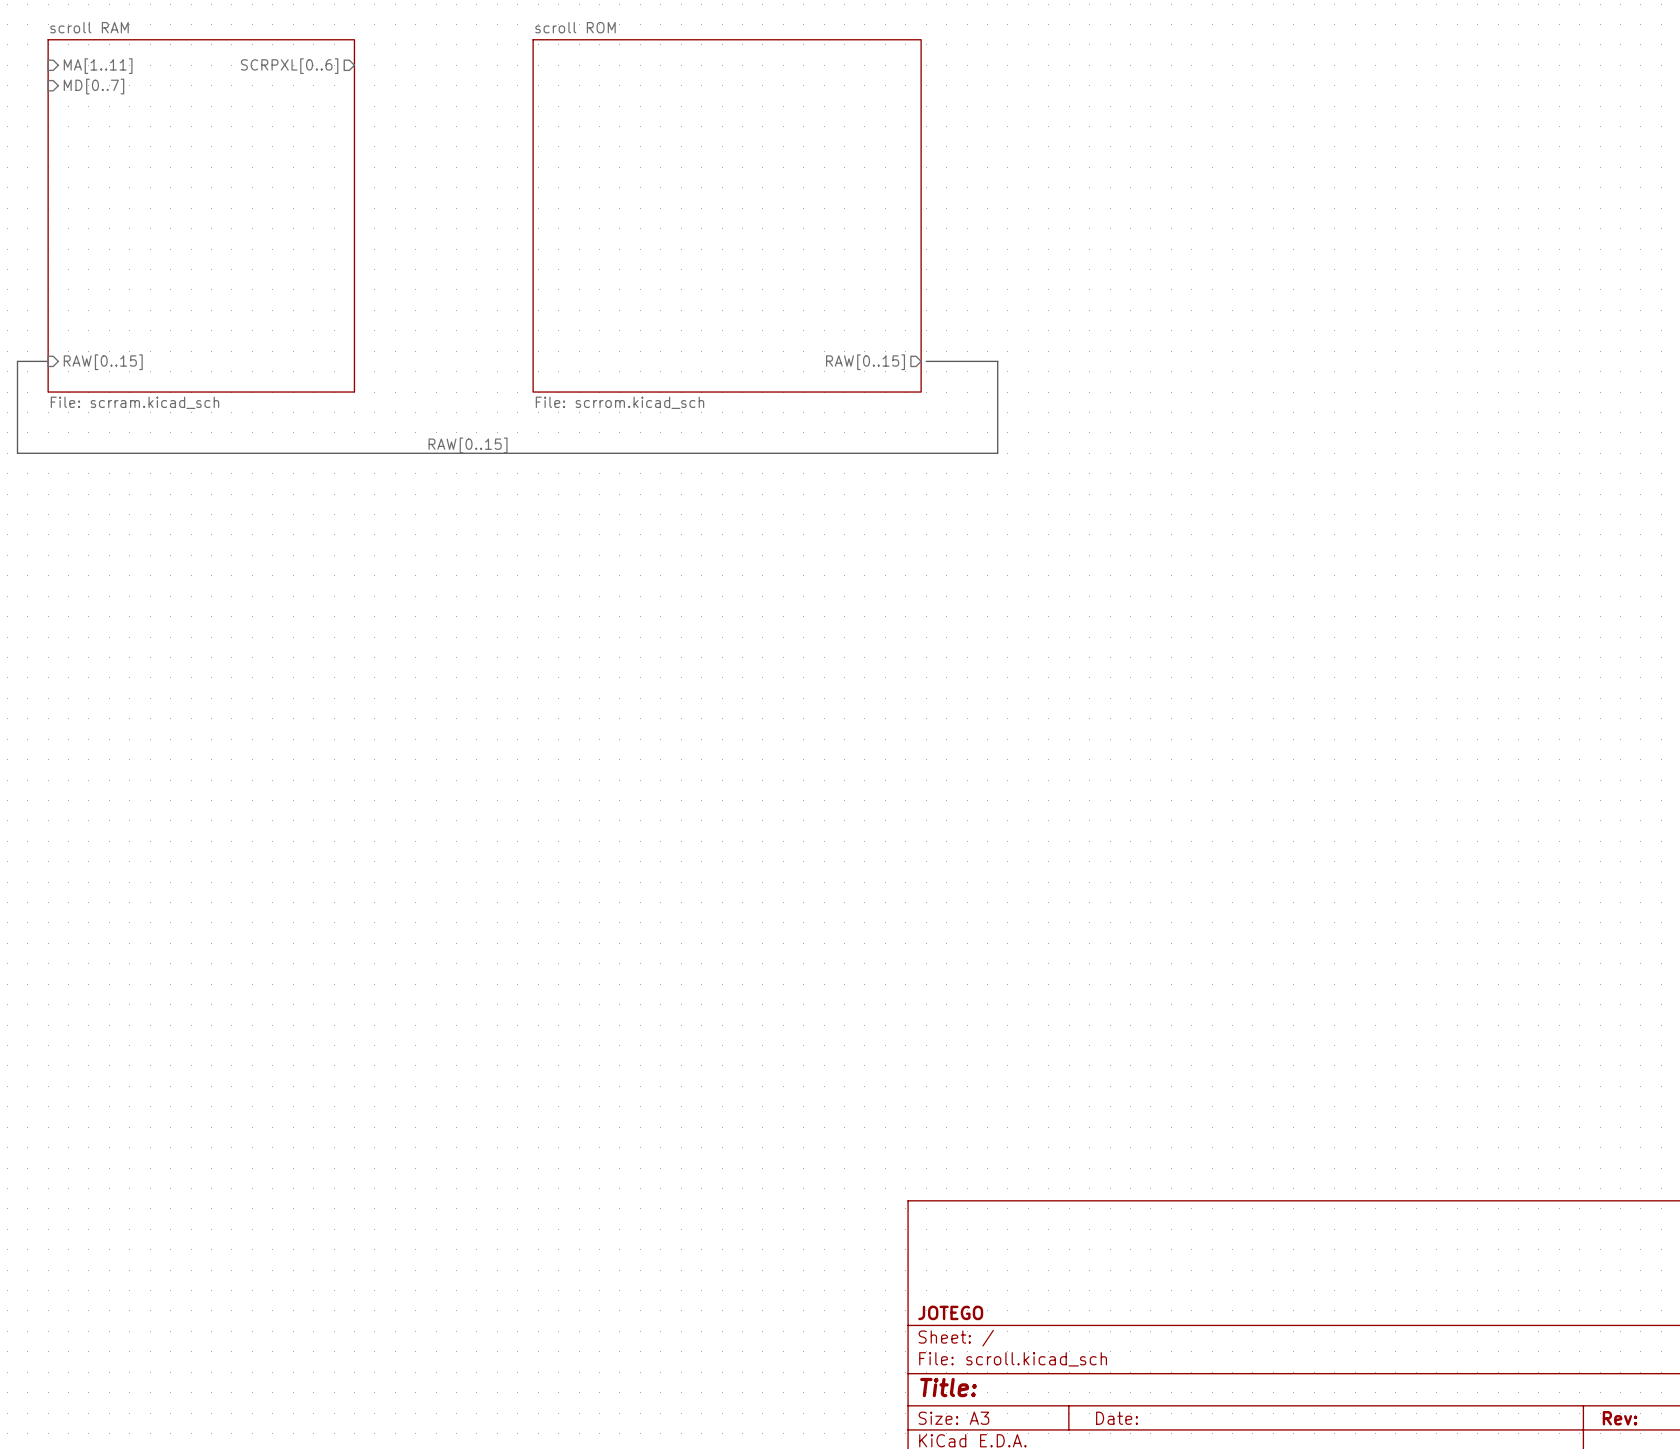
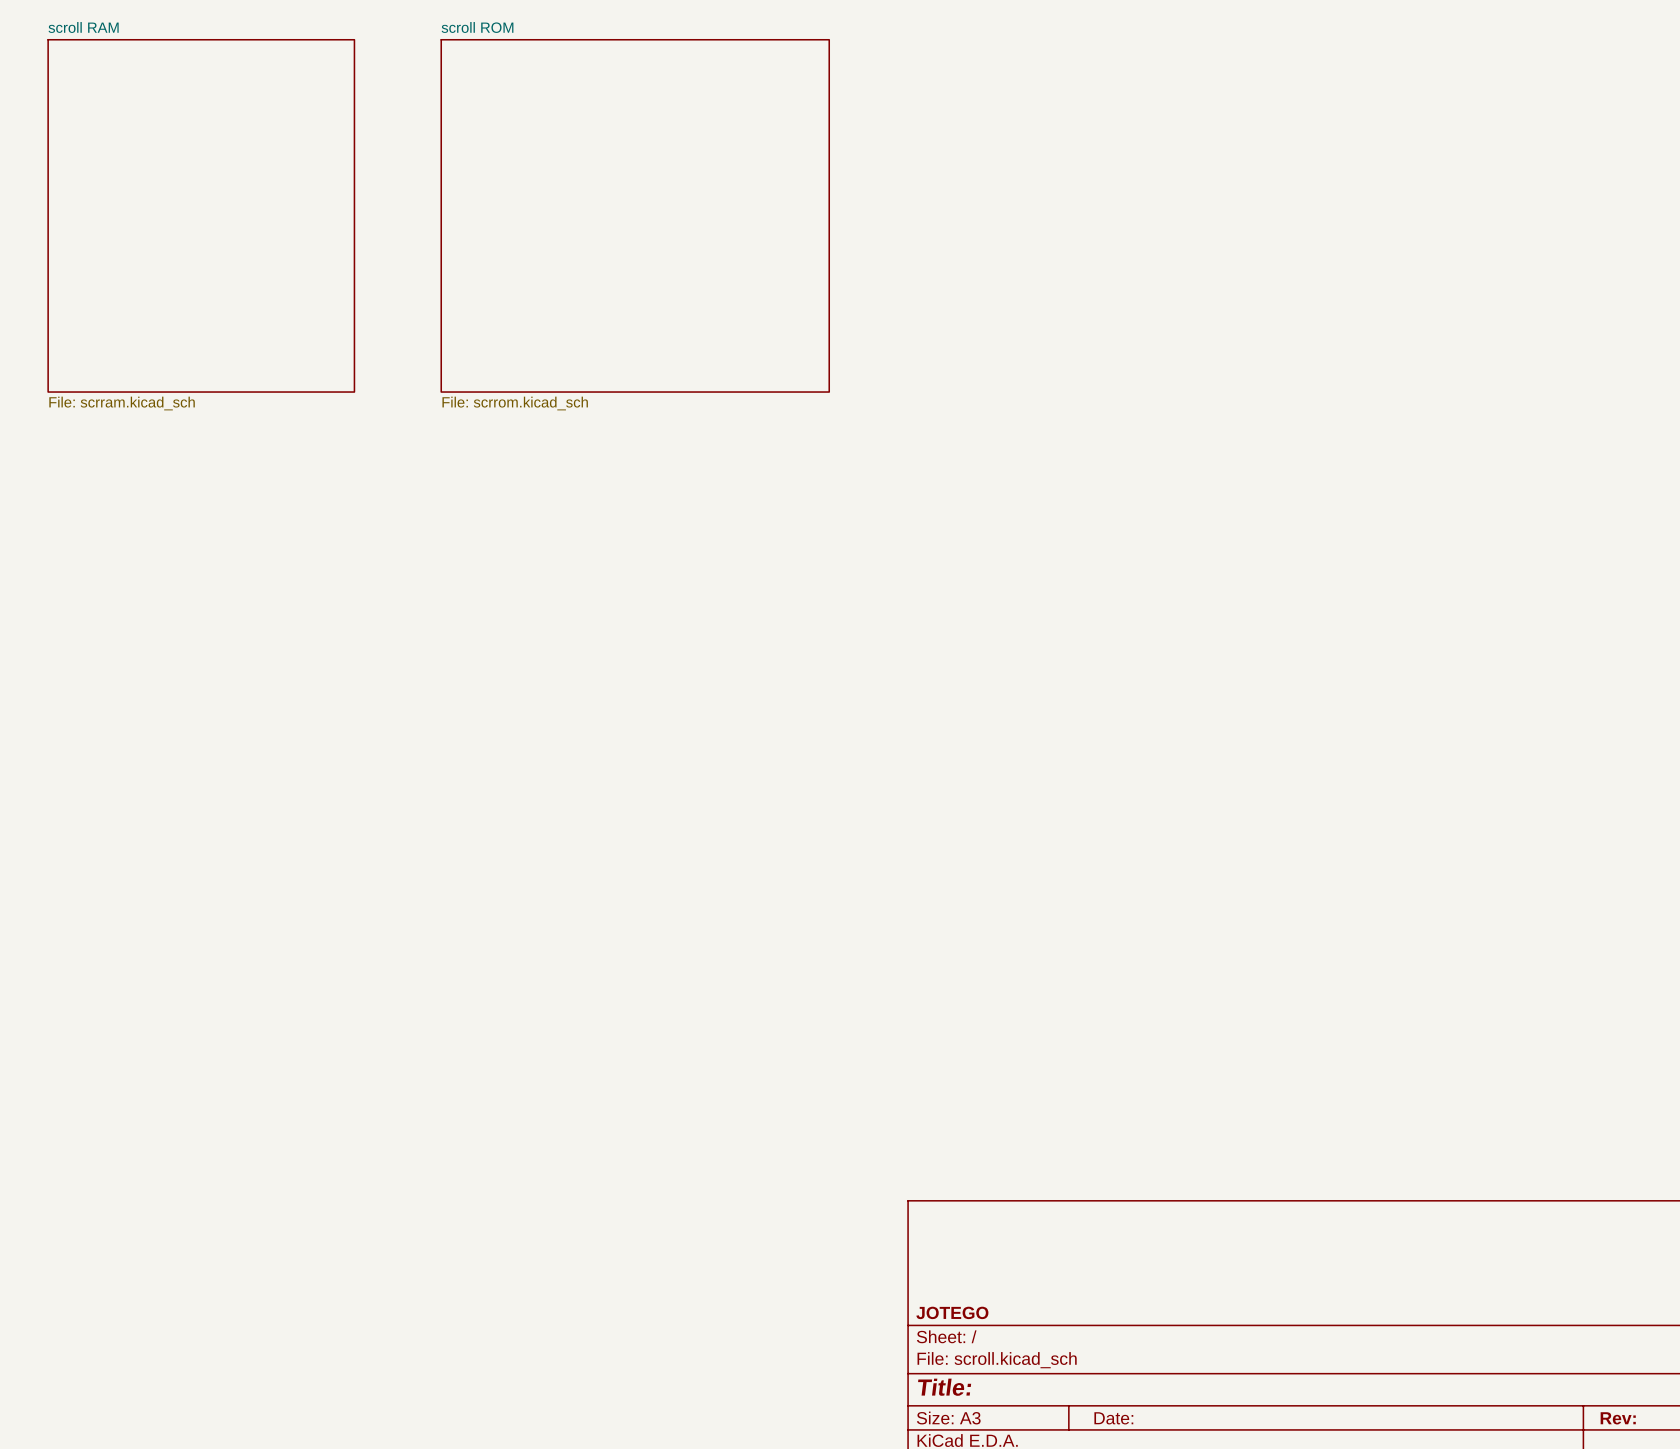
sheet pin: MA[1..11] (98, 66) -> none
sheet pin: SCRPXL[0..6] (289, 66) -> none
sheet pin: MD[0..7] (93, 86) -> none
sheet scroll ROM position: (727, 215) -> (635, 215)
bus: (48, 361) (17, 361) (17, 453) (997, 453) (997, 361) (926, 361) -> none
sheet pin: RAW[0..15] (103, 362) -> none
sheet pin: RAW[0..15] (865, 362) -> none
label: RAW[0..15] (468, 445) -> none

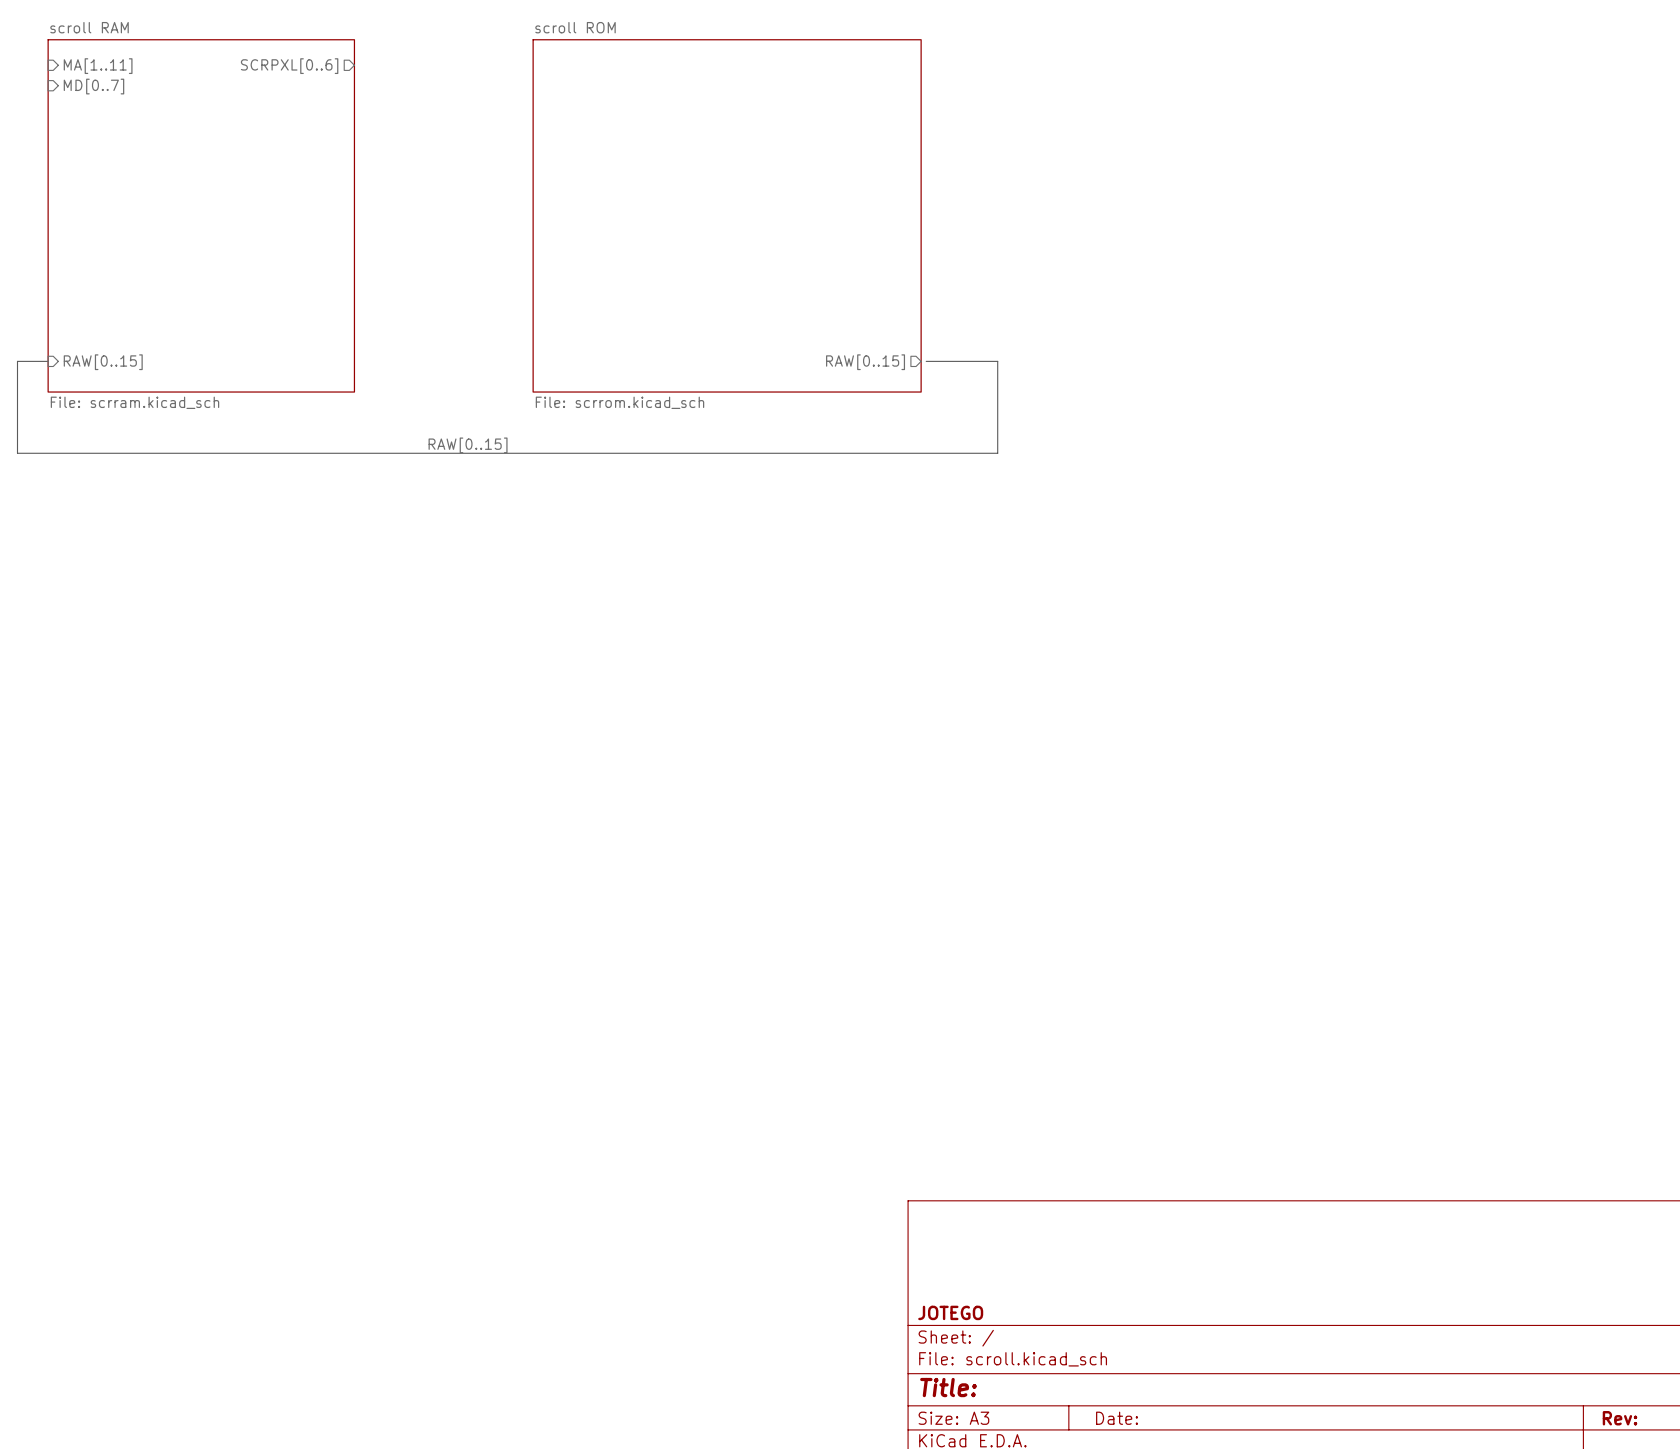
sheet pin: none -> MA[1..11] (98, 66)
sheet pin: none -> SCRPXL[0..6] (289, 66)
sheet pin: none -> MD[0..7] (93, 86)
sheet scroll ROM position: (635, 215) -> (727, 215)
bus: none -> (48, 361) (17, 361) (17, 453) (997, 453) (997, 361) (926, 361)
sheet pin: none -> RAW[0..15] (103, 362)
sheet pin: none -> RAW[0..15] (865, 362)
label: none -> RAW[0..15] (468, 445)

